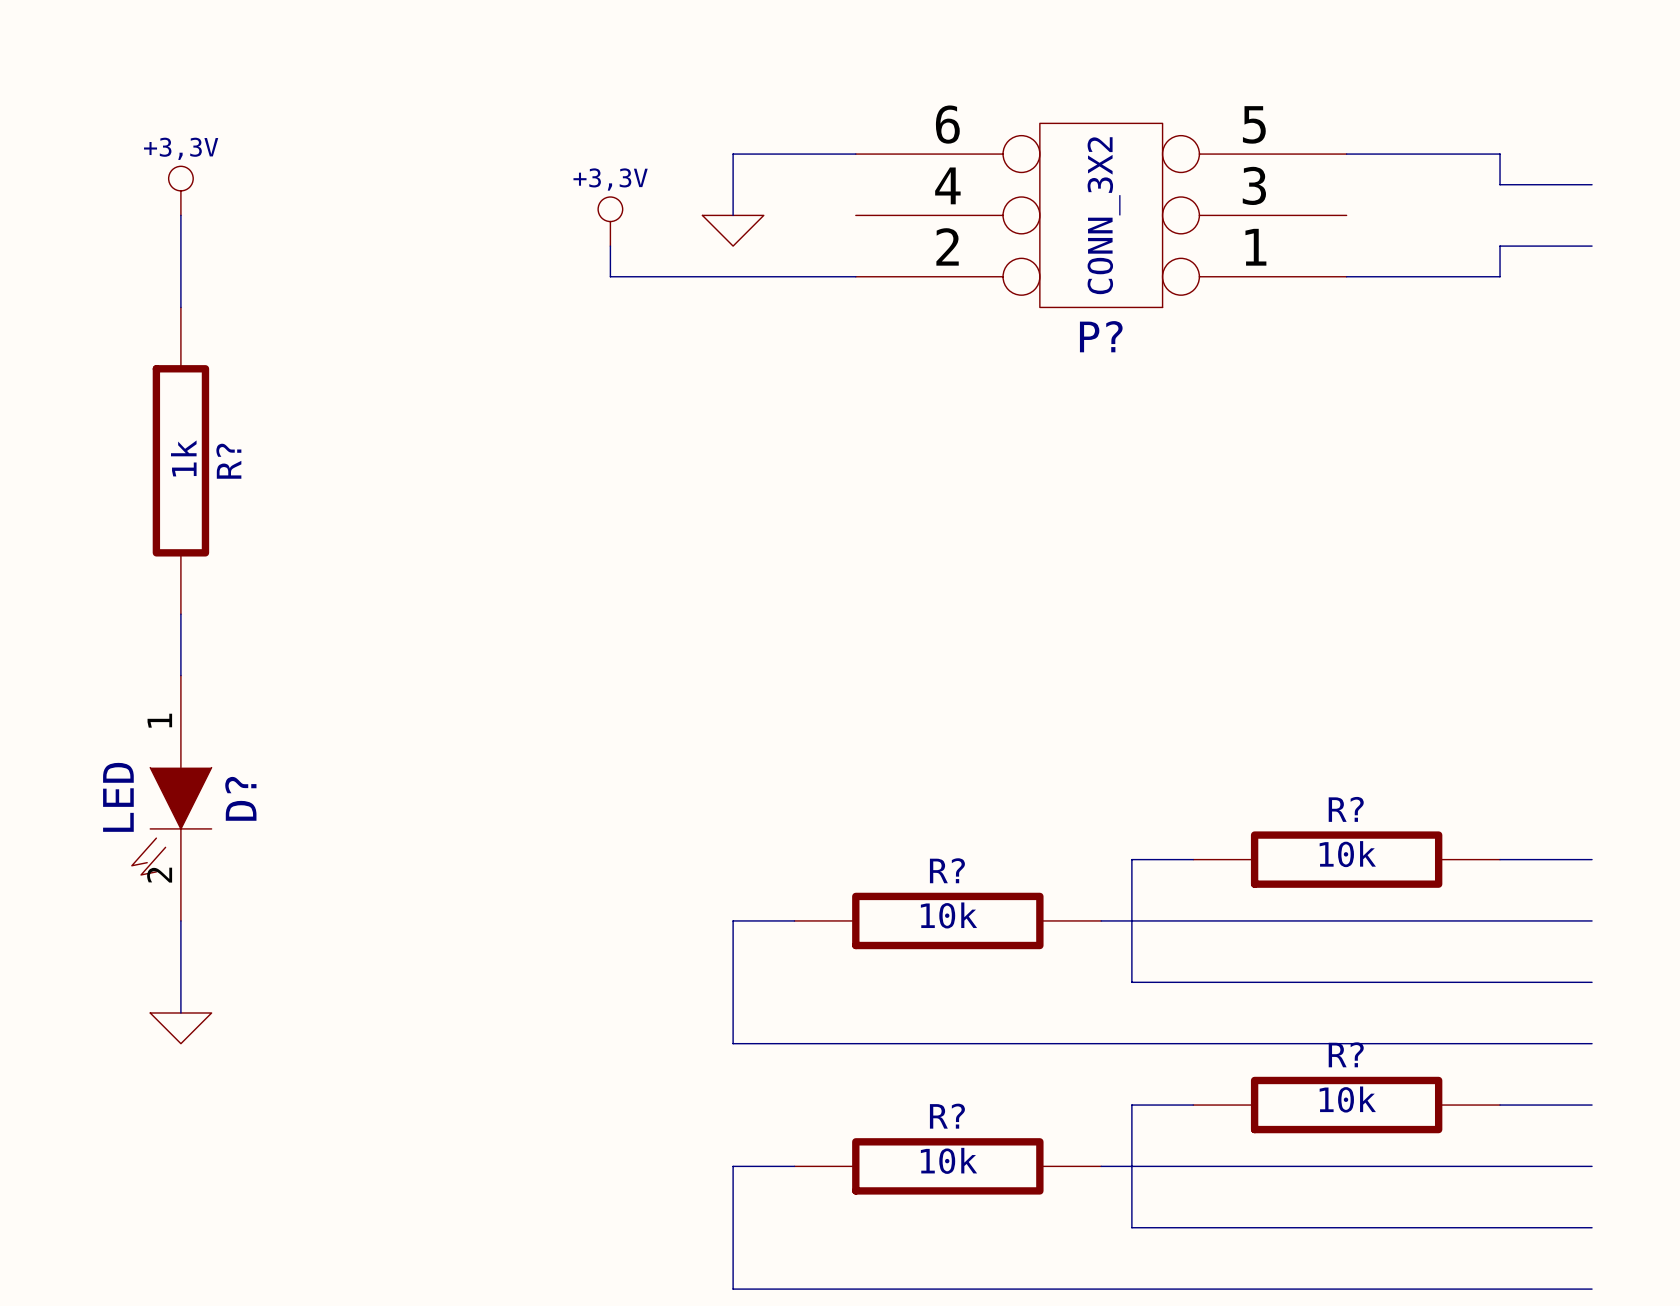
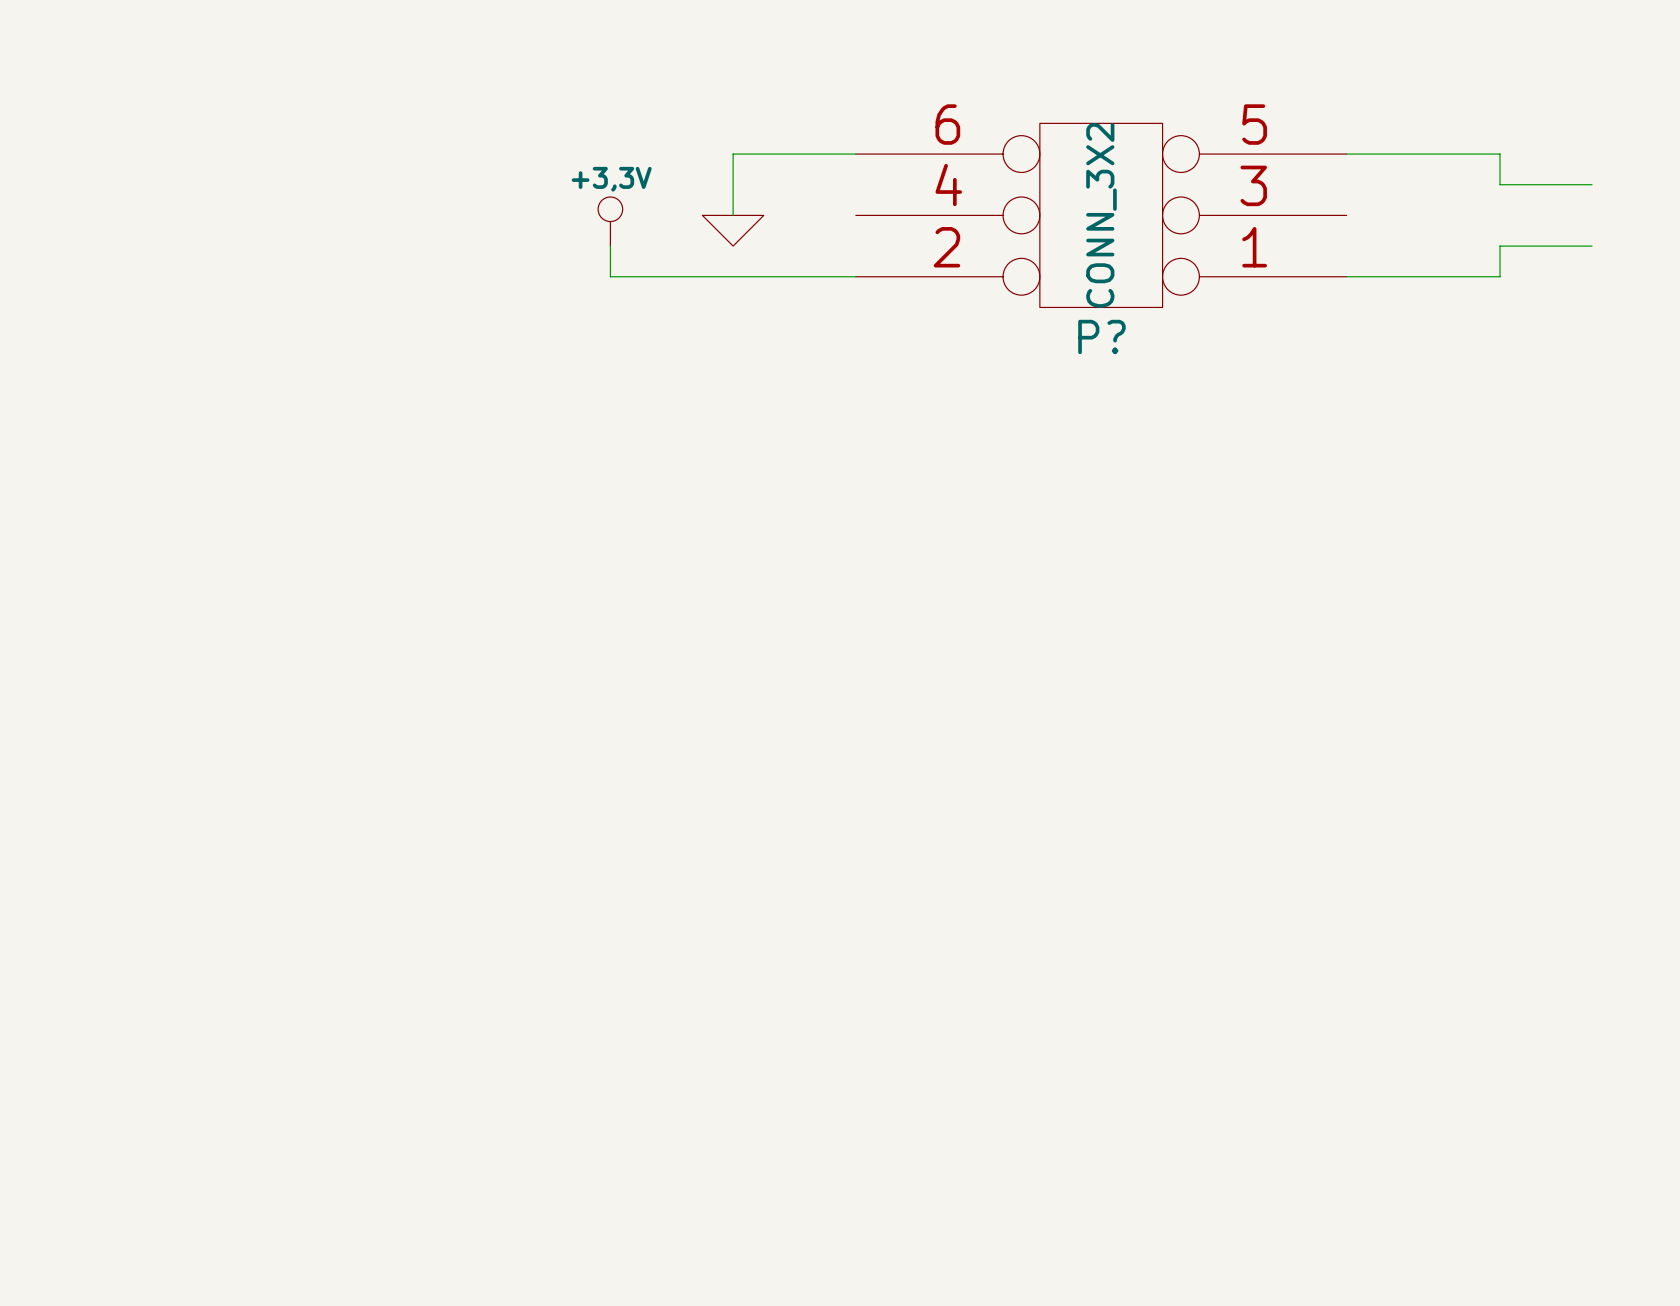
power symbol: +3,3V (180, 190) -> none
wire: (180, 215) (180, 307) -> none
R?: 1k (180, 460) -> none
wire: (180, 614) (180, 675) -> none
D?: LED (171, 798) -> none
wire: (1193, 859) (1131, 859) (1131, 982) (1592, 982) -> none
R?: 10k (1346, 859) -> none
wire: (1500, 859) (1592, 859) -> none
wire: (180, 920) (180, 1012) -> none
wire: (794, 920) (733, 920) (733, 1043) (1592, 1043) -> none
R?: 10k (947, 920) -> none
wire: (1101, 920) (1592, 920) -> none
power symbol: (180, 1028) -> none
wire: (1193, 1105) (1131, 1105) (1131, 1227) (1592, 1227) -> none
R?: 10k (1346, 1105) -> none
wire: (1500, 1105) (1592, 1105) -> none
wire: (794, 1166) (733, 1166) (733, 1289) (1592, 1289) -> none
R?: 10k (947, 1166) -> none
wire: (1101, 1166) (1592, 1166) -> none

